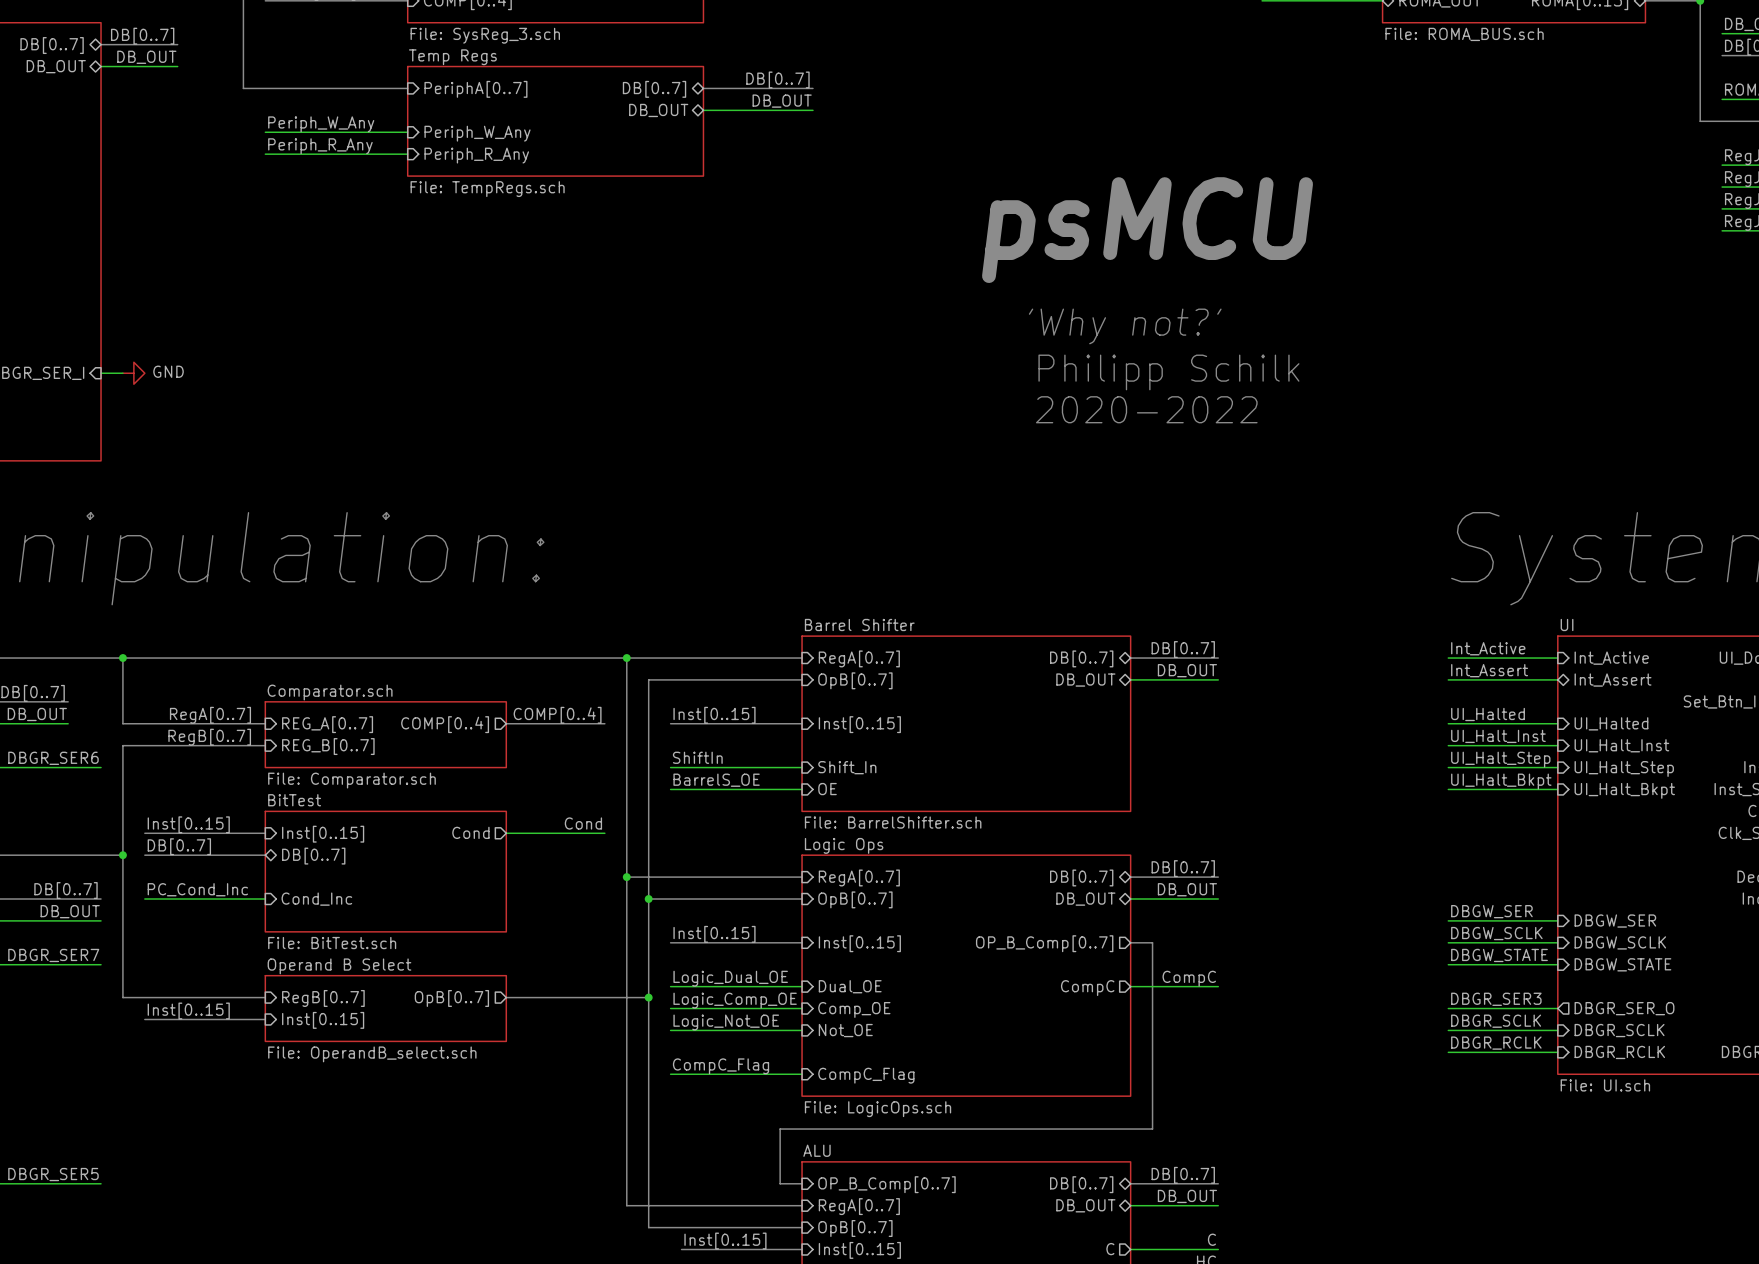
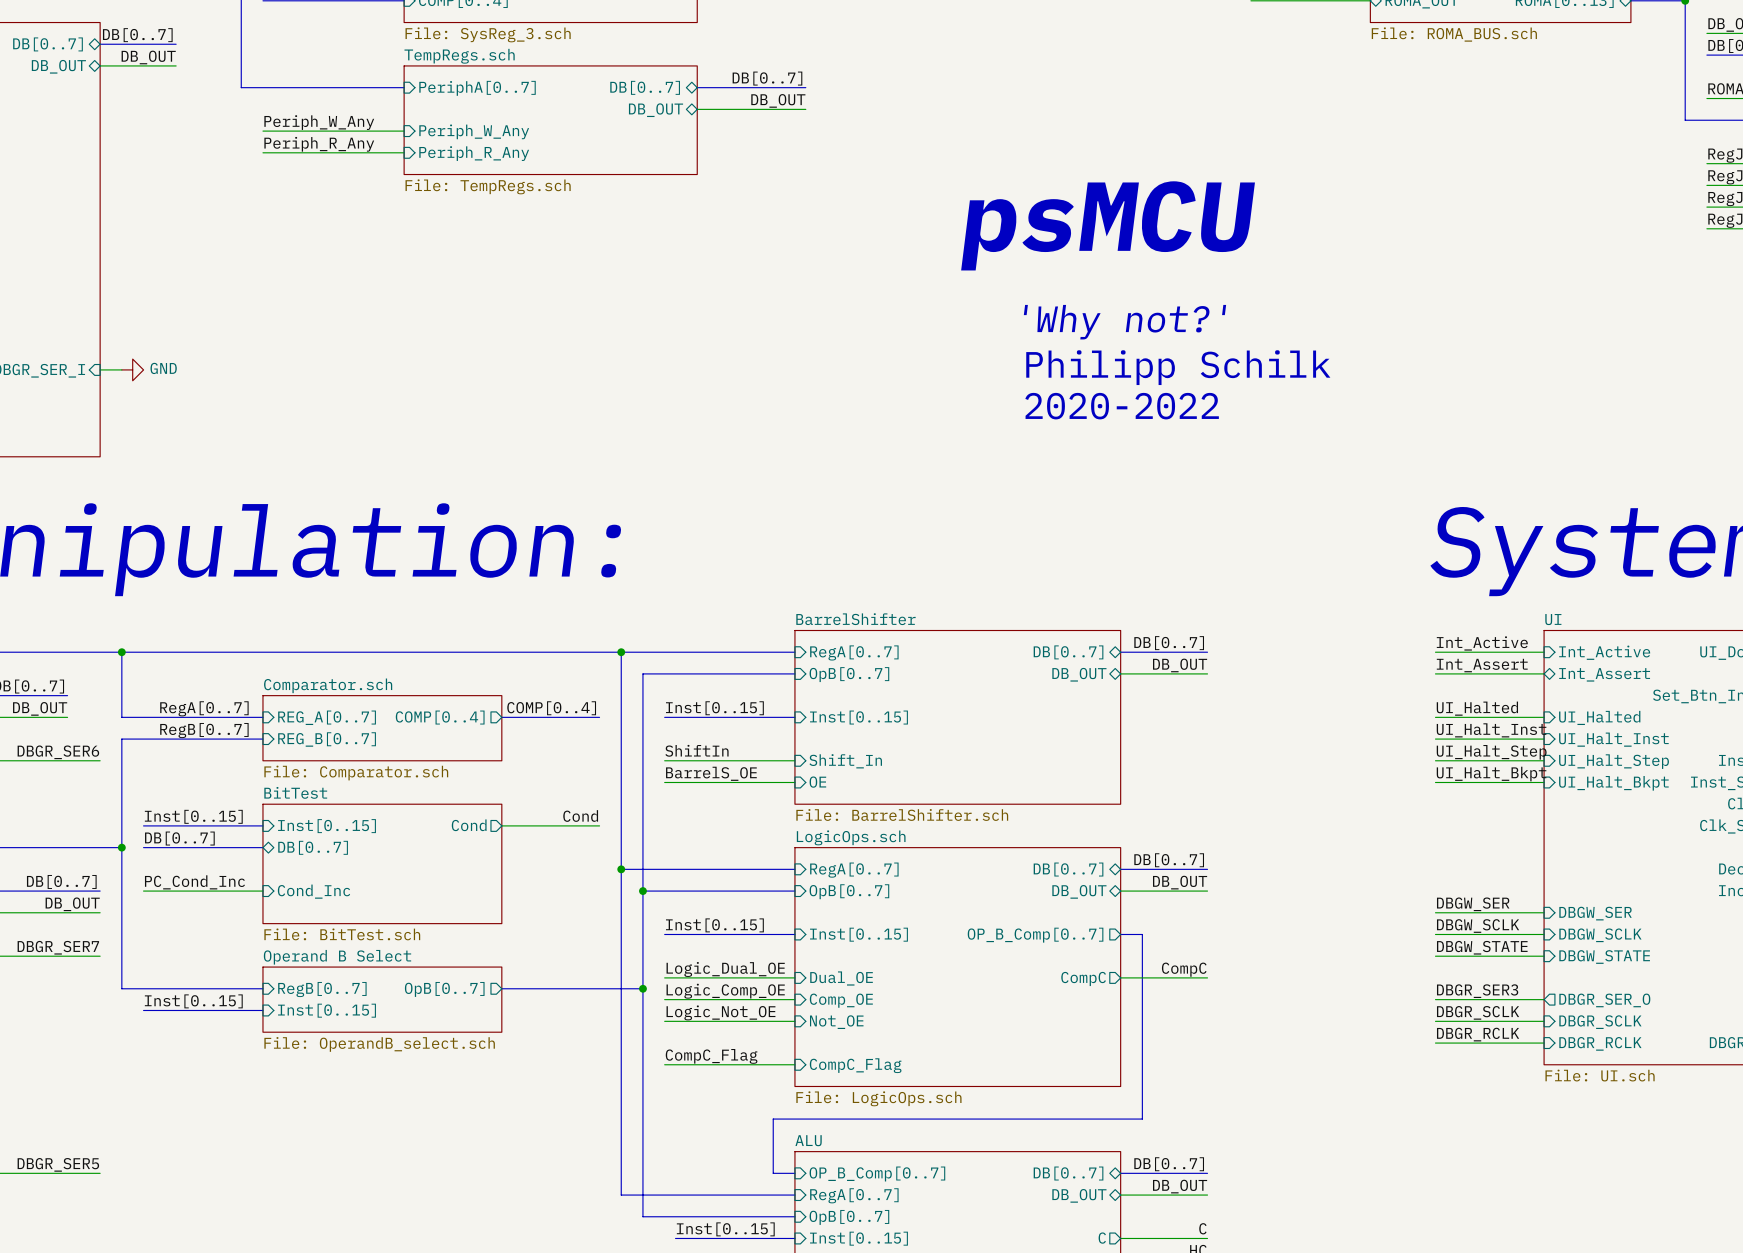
sheet Temp Regs name: Temp Regs (452, 57) -> TempRegs.sch (459, 56)
sheet Barrel Shifter name: Barrel Shifter (859, 624) -> BarrelShifter (855, 619)
sheet Logic Ops name: Logic Ops (844, 845) -> LogicOps.sch (851, 837)

